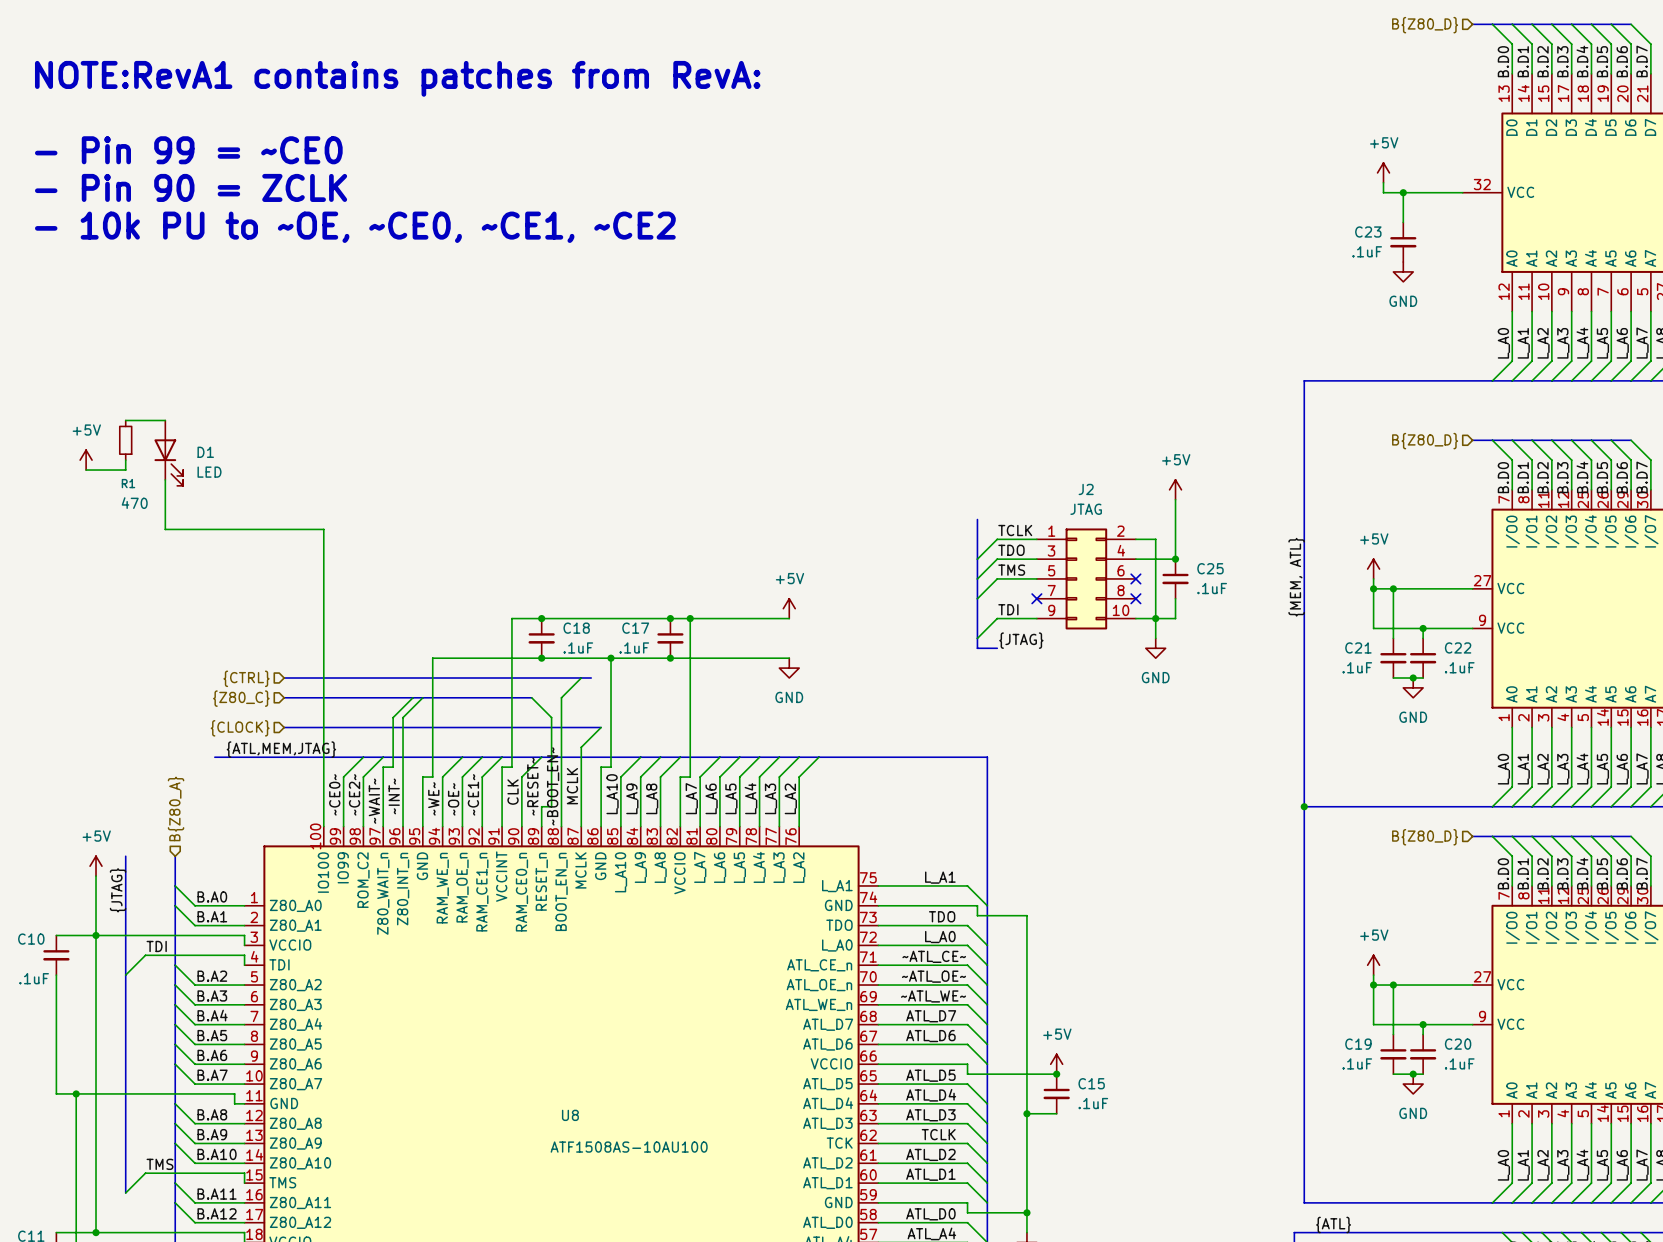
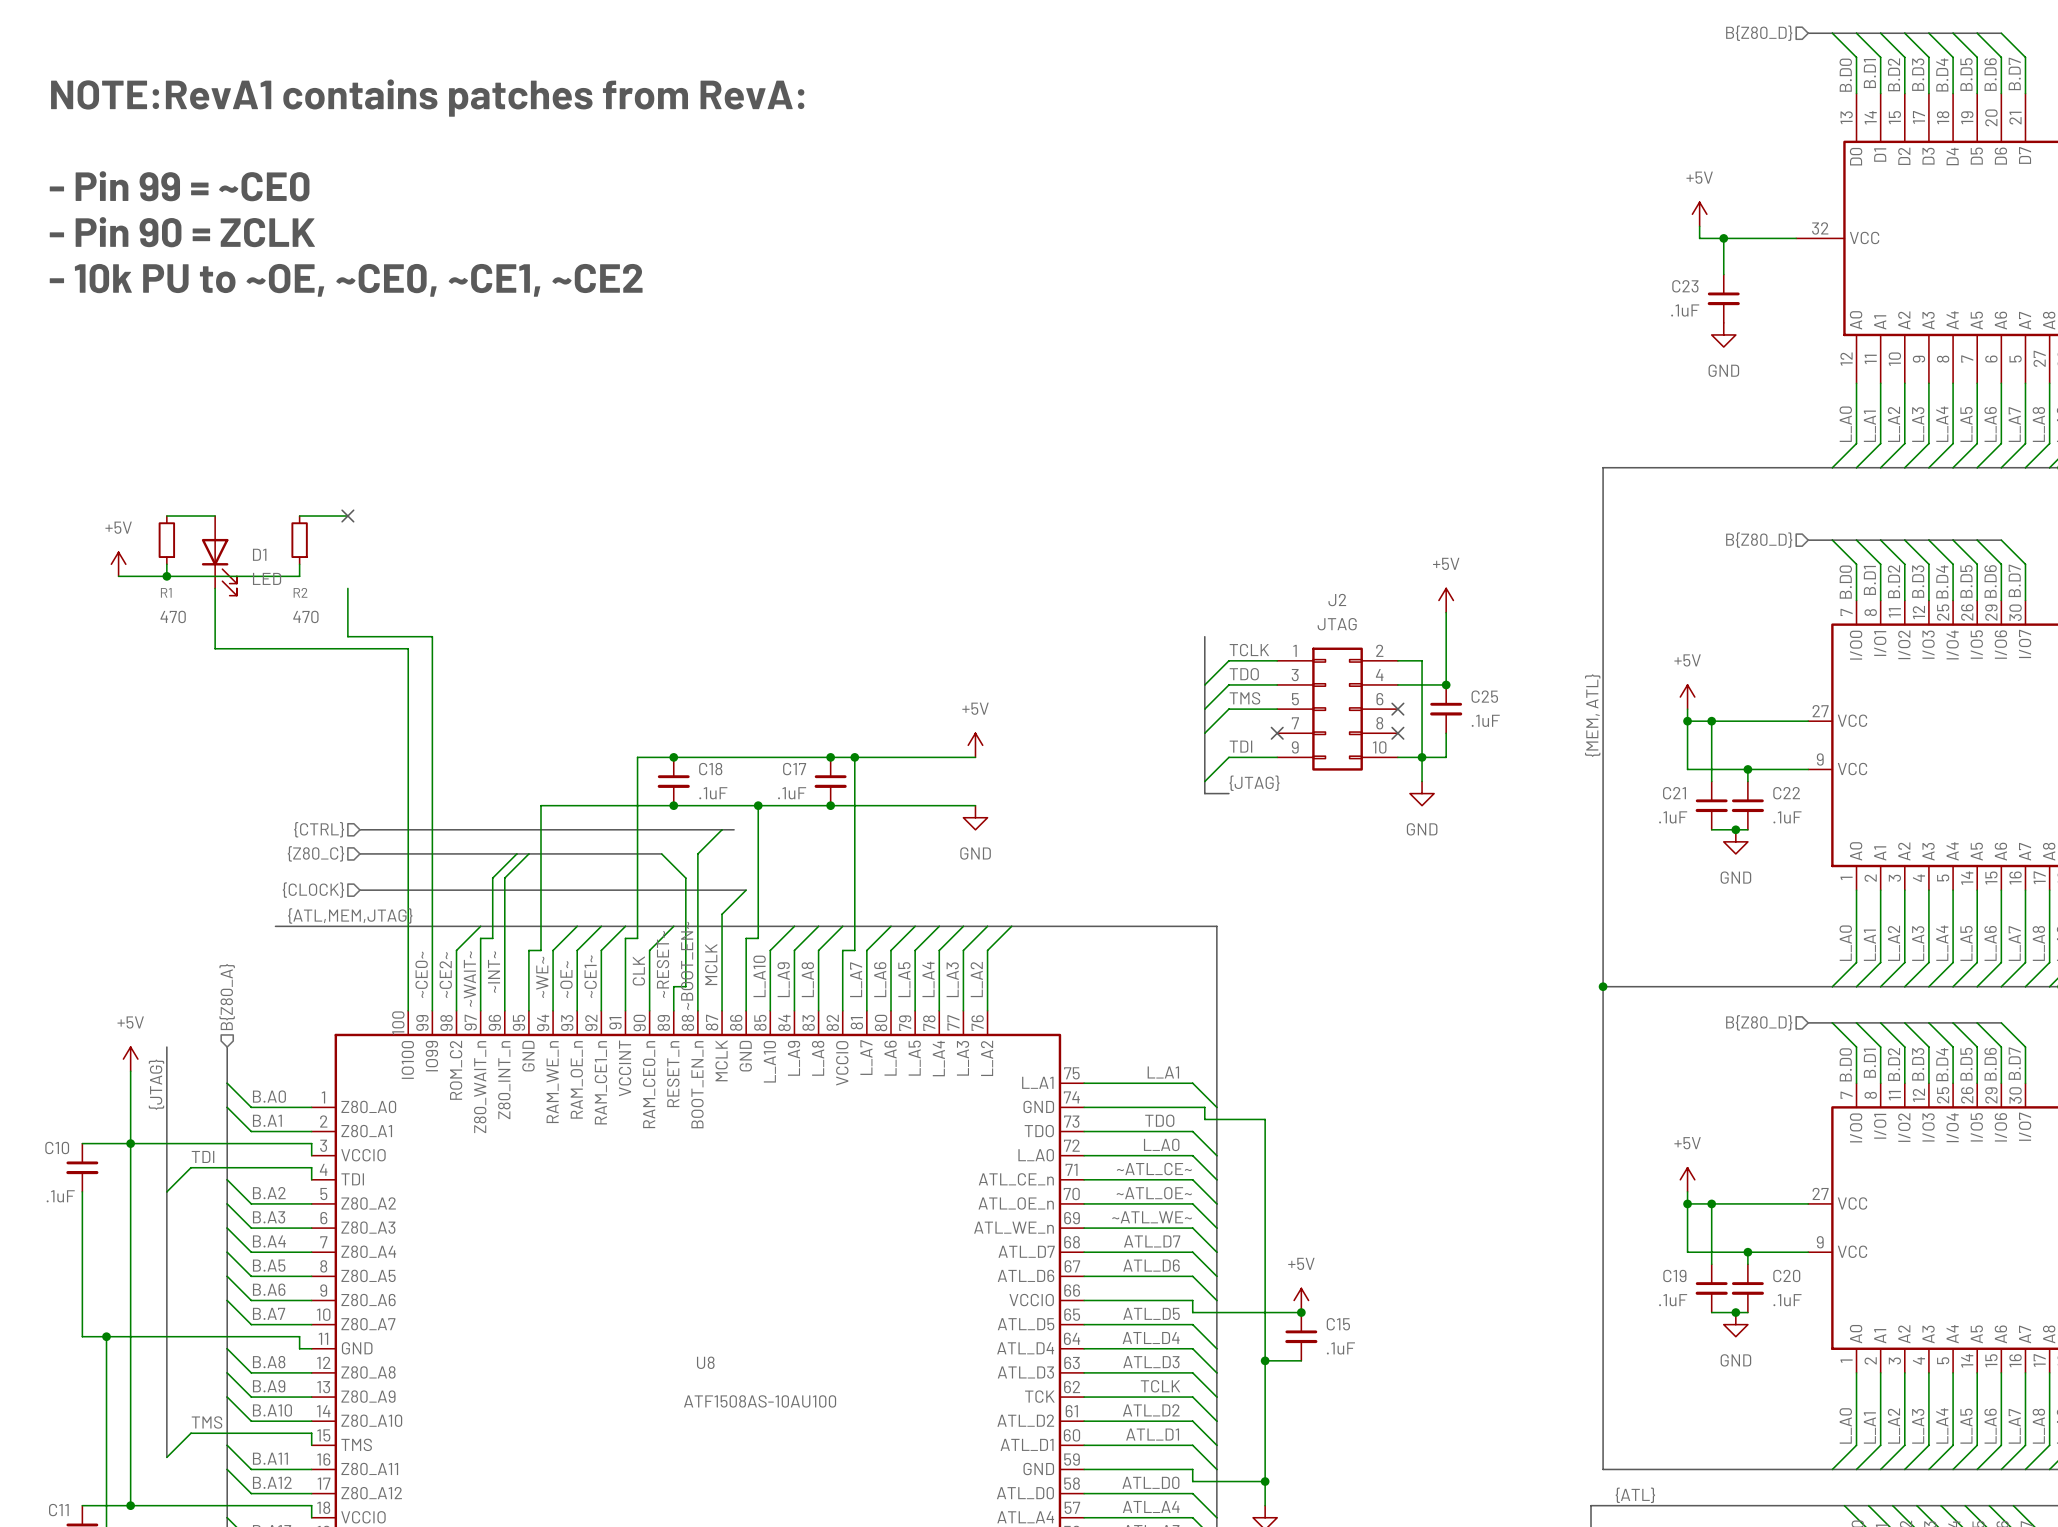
wire: none -> (299, 516) (347, 516)
no-connect mark: none -> (347, 516)
R2: none -> 470 (299, 540)
wire: none -> (299, 564) (299, 576) (166, 576)
junction: none -> (166, 576)
wire: (363, 757) (343, 777) -> (347, 588) (347, 636) (432, 636) (432, 950)

